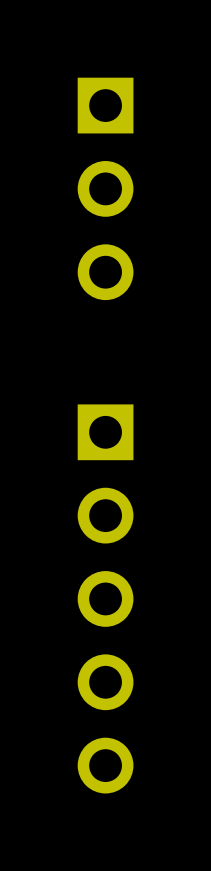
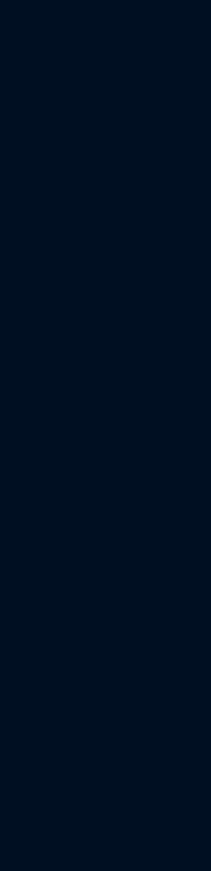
part: (105, 188) -> none
part: (105, 598) -> none

